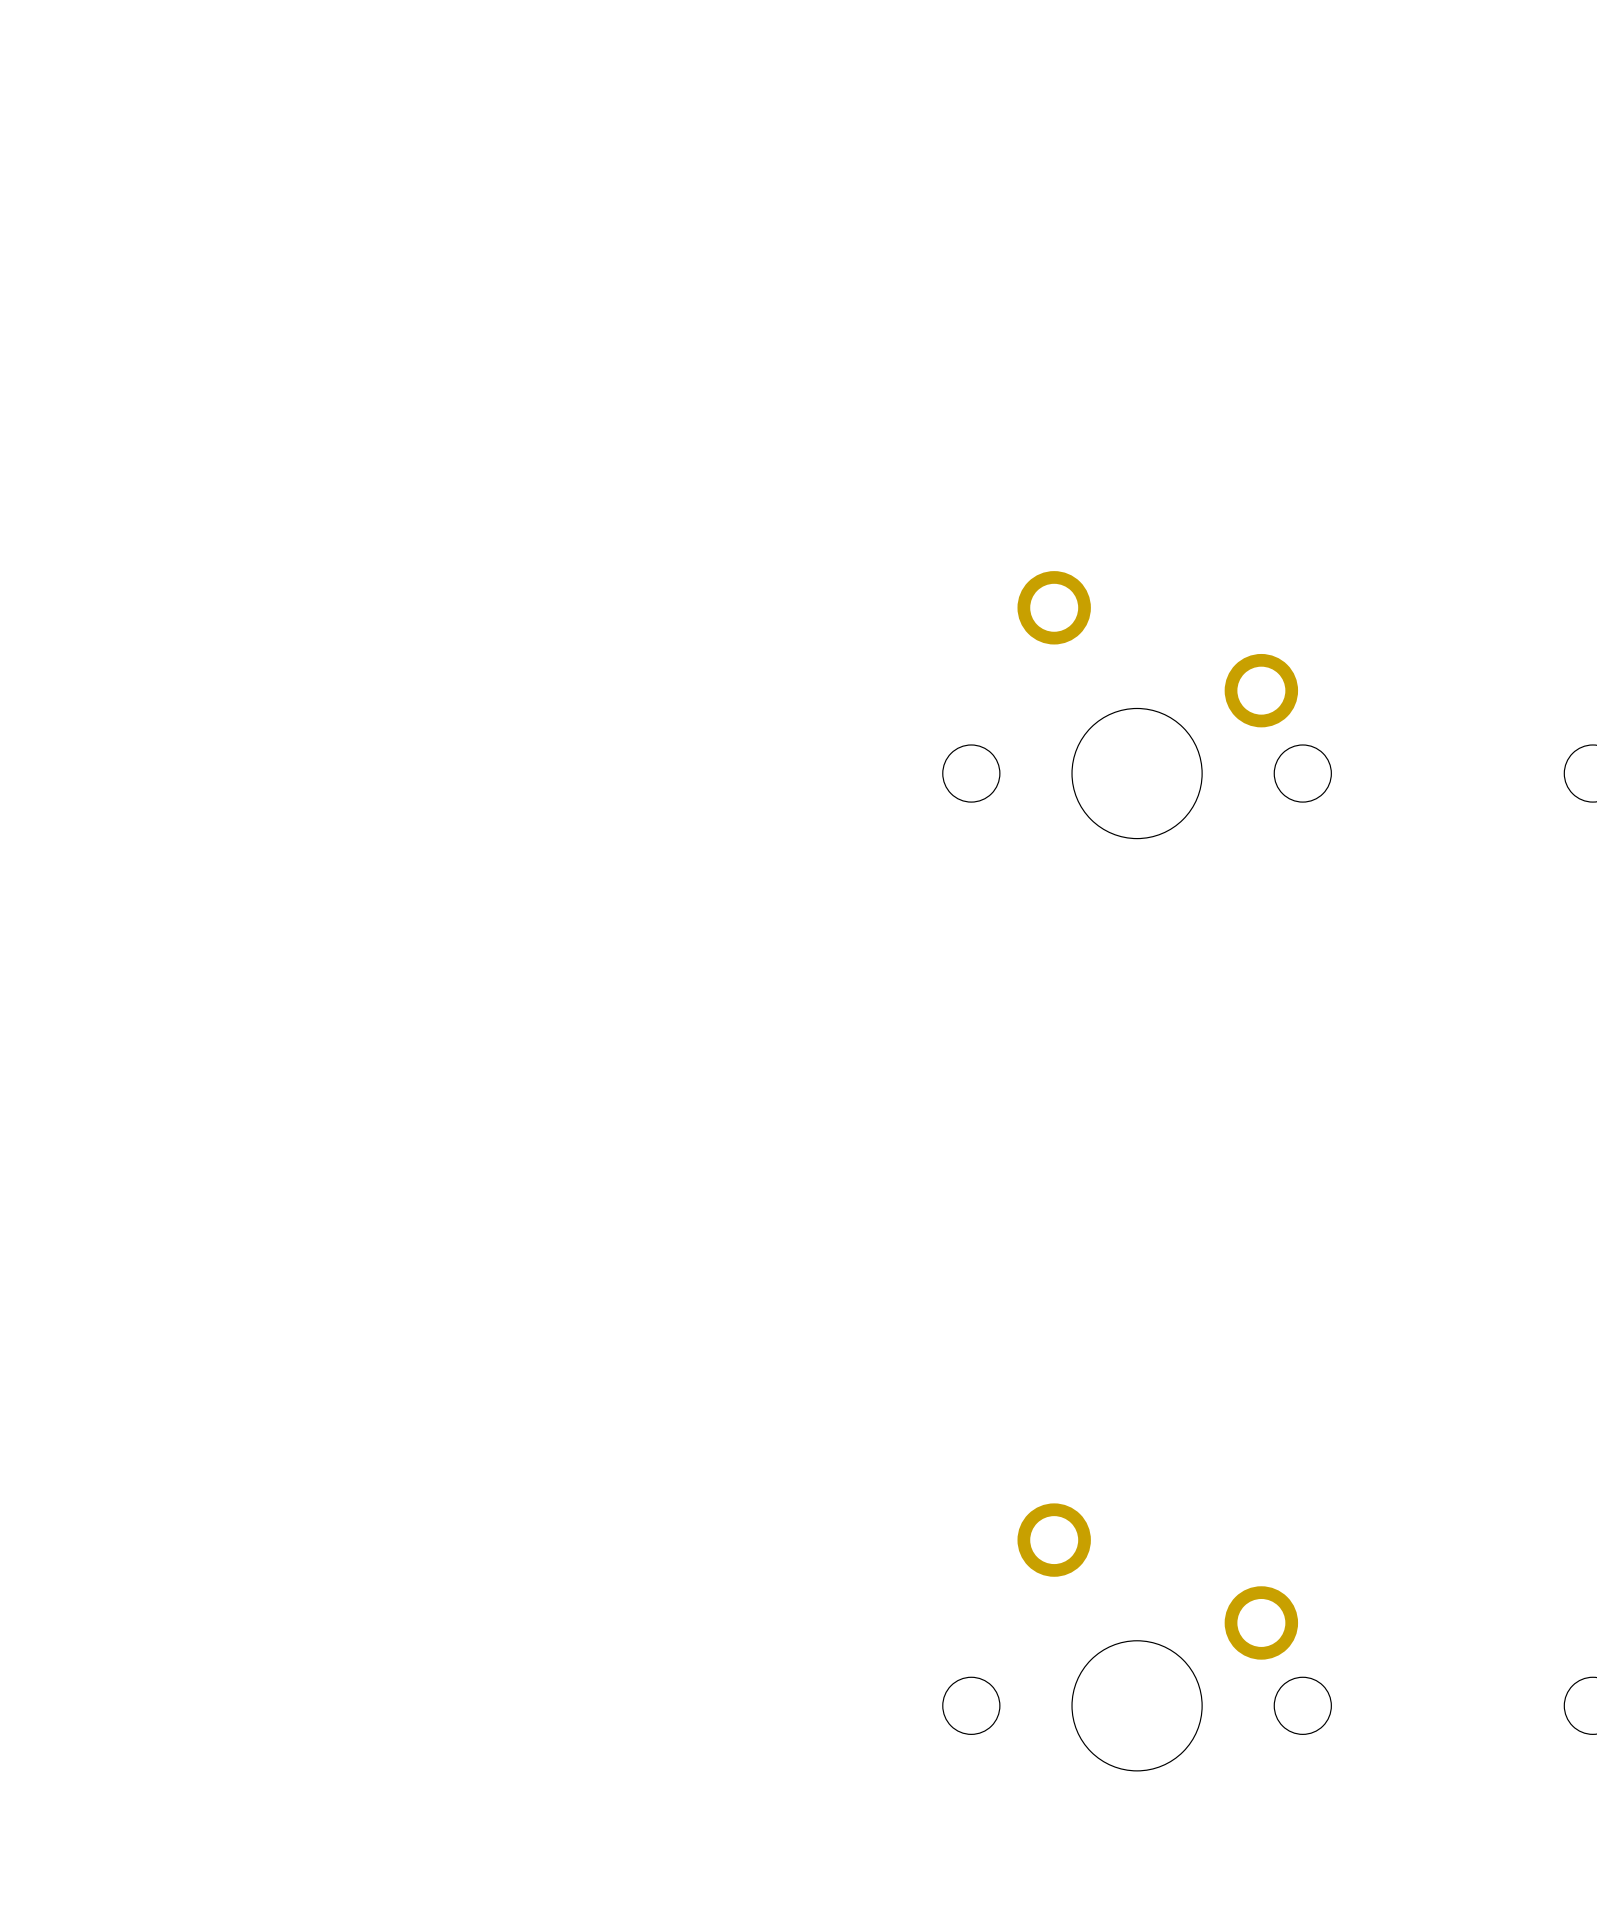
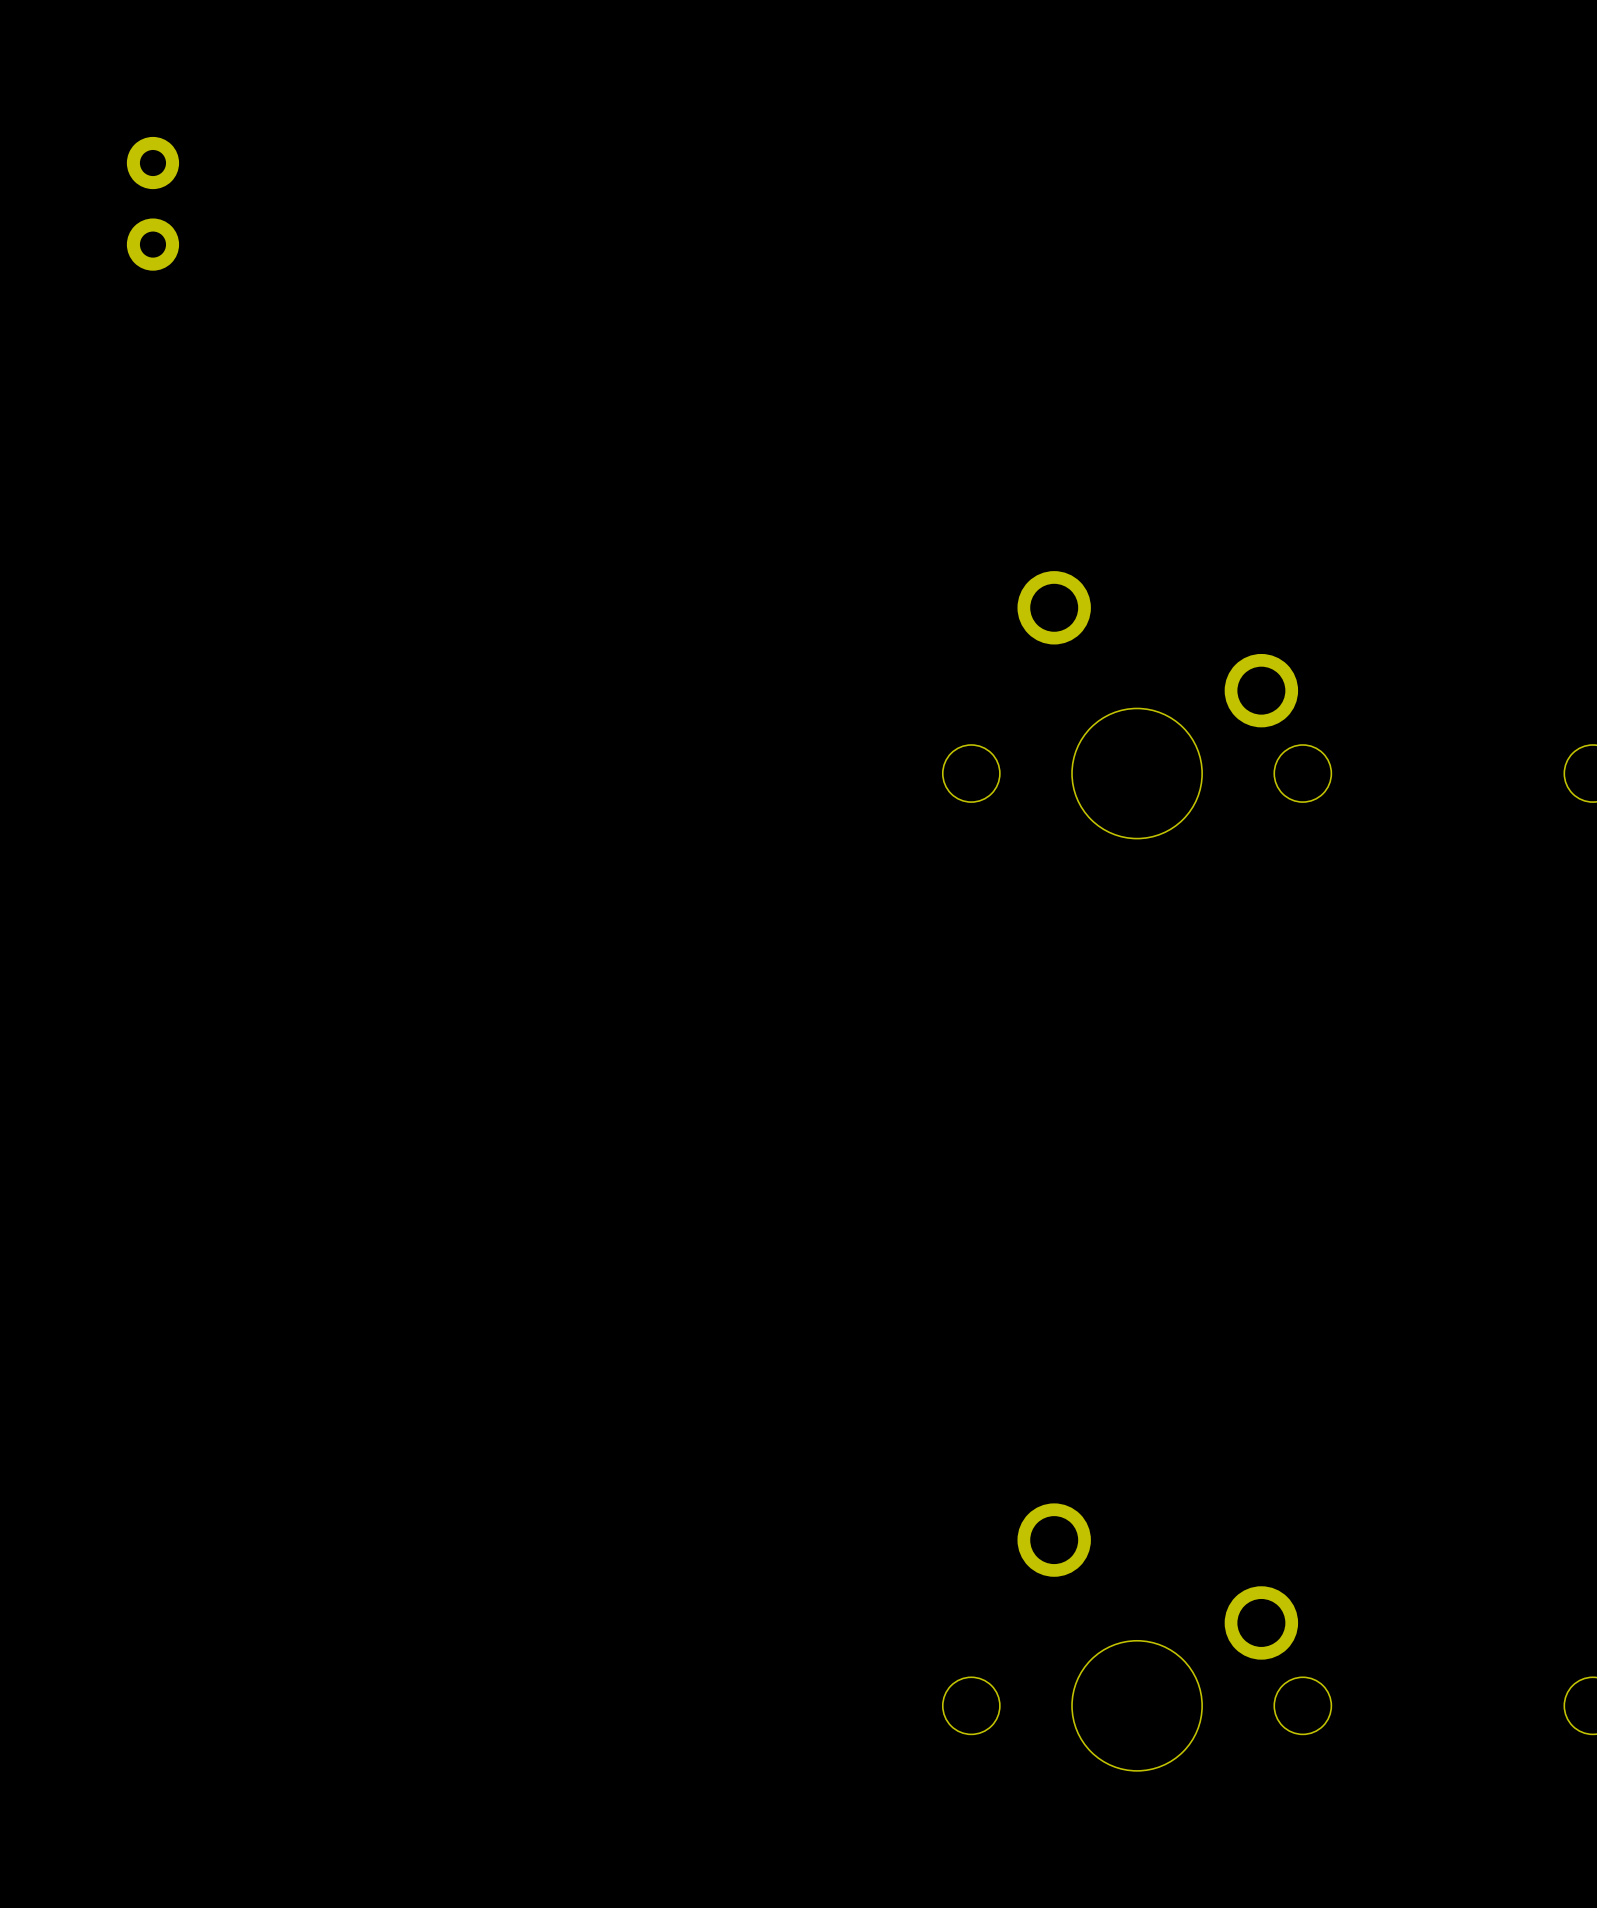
part: none -> (152, 203)

